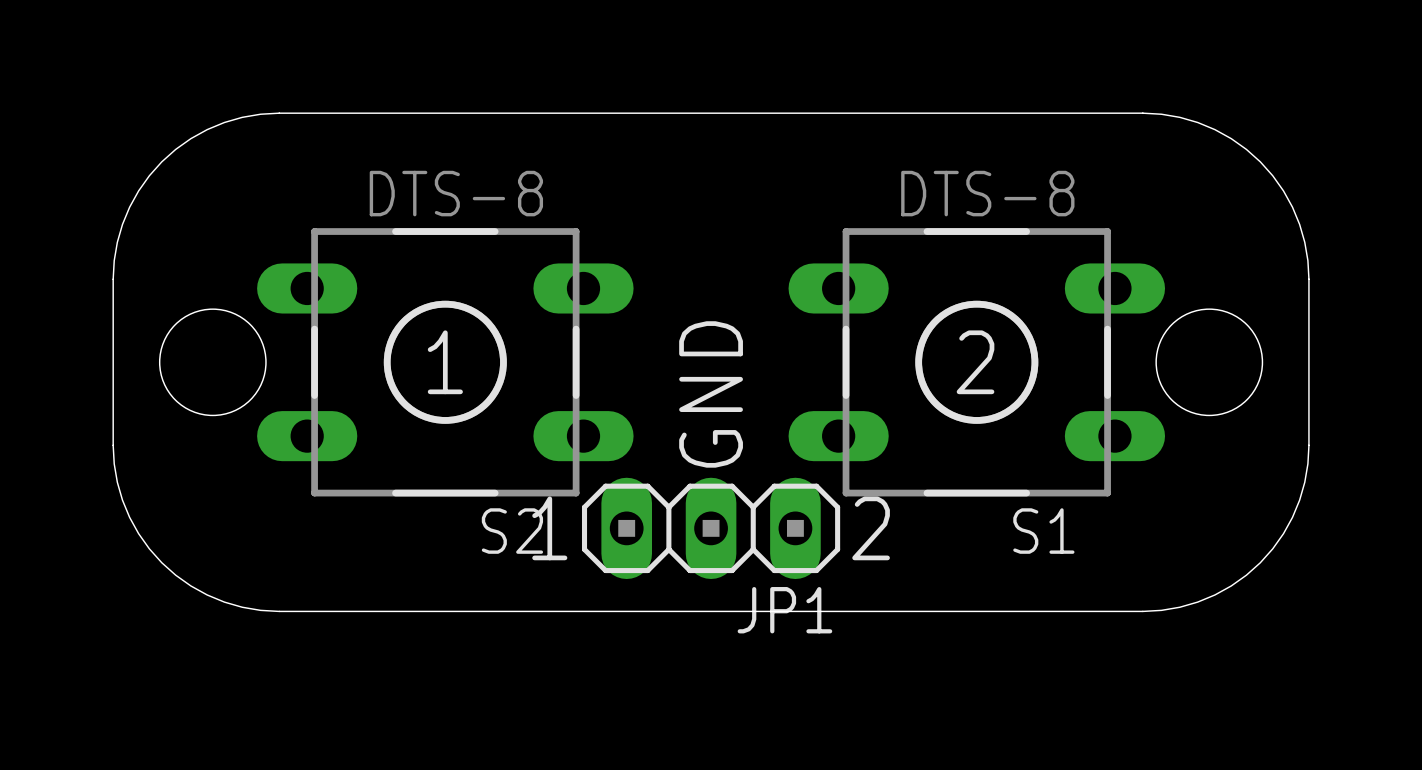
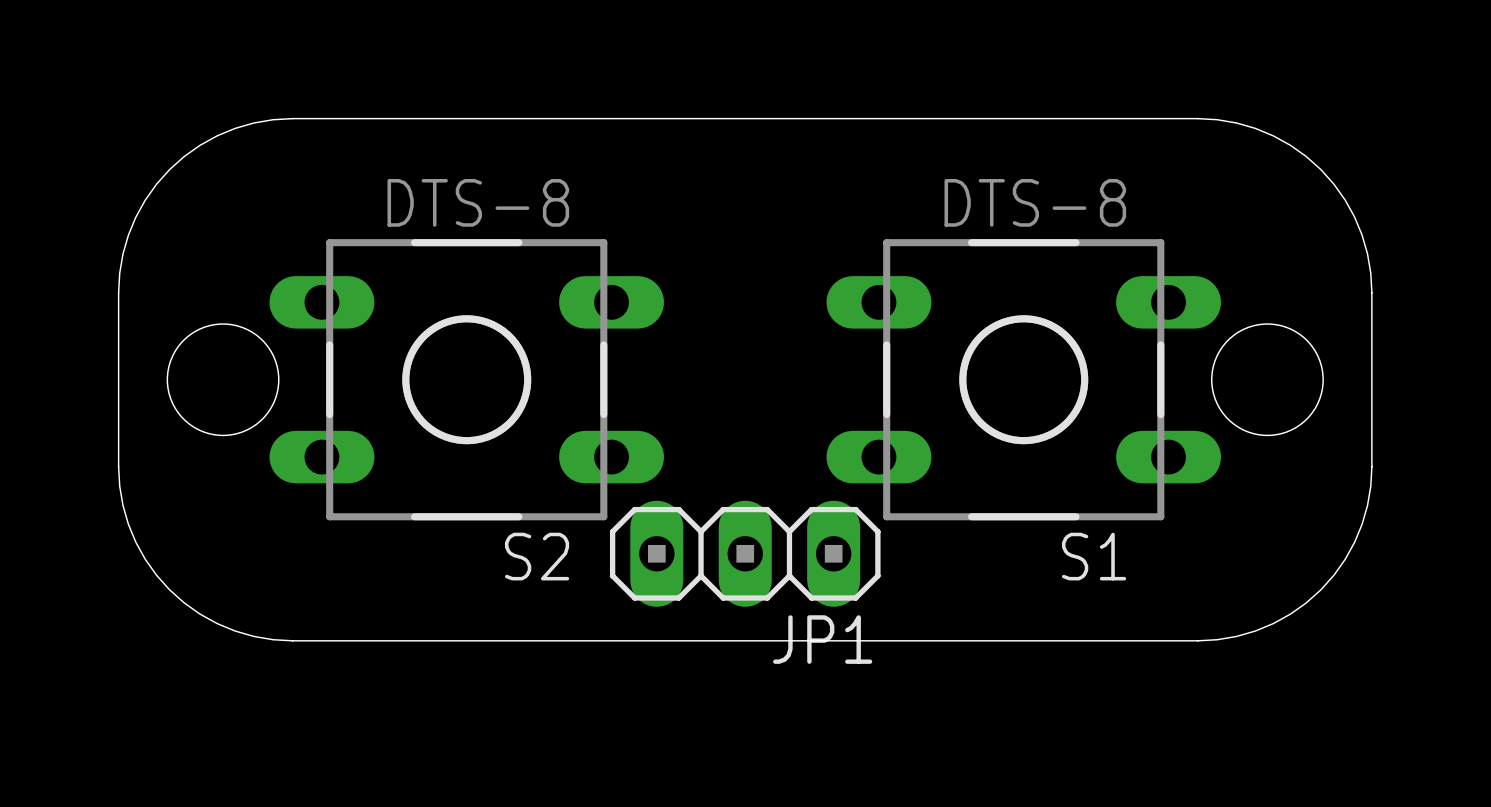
text: 1 (445, 362) -> none
text: 2 (975, 362) -> none
text: GND (711, 394) -> none
text: 1 (549, 528) -> none
text: 2 (871, 528) -> none

